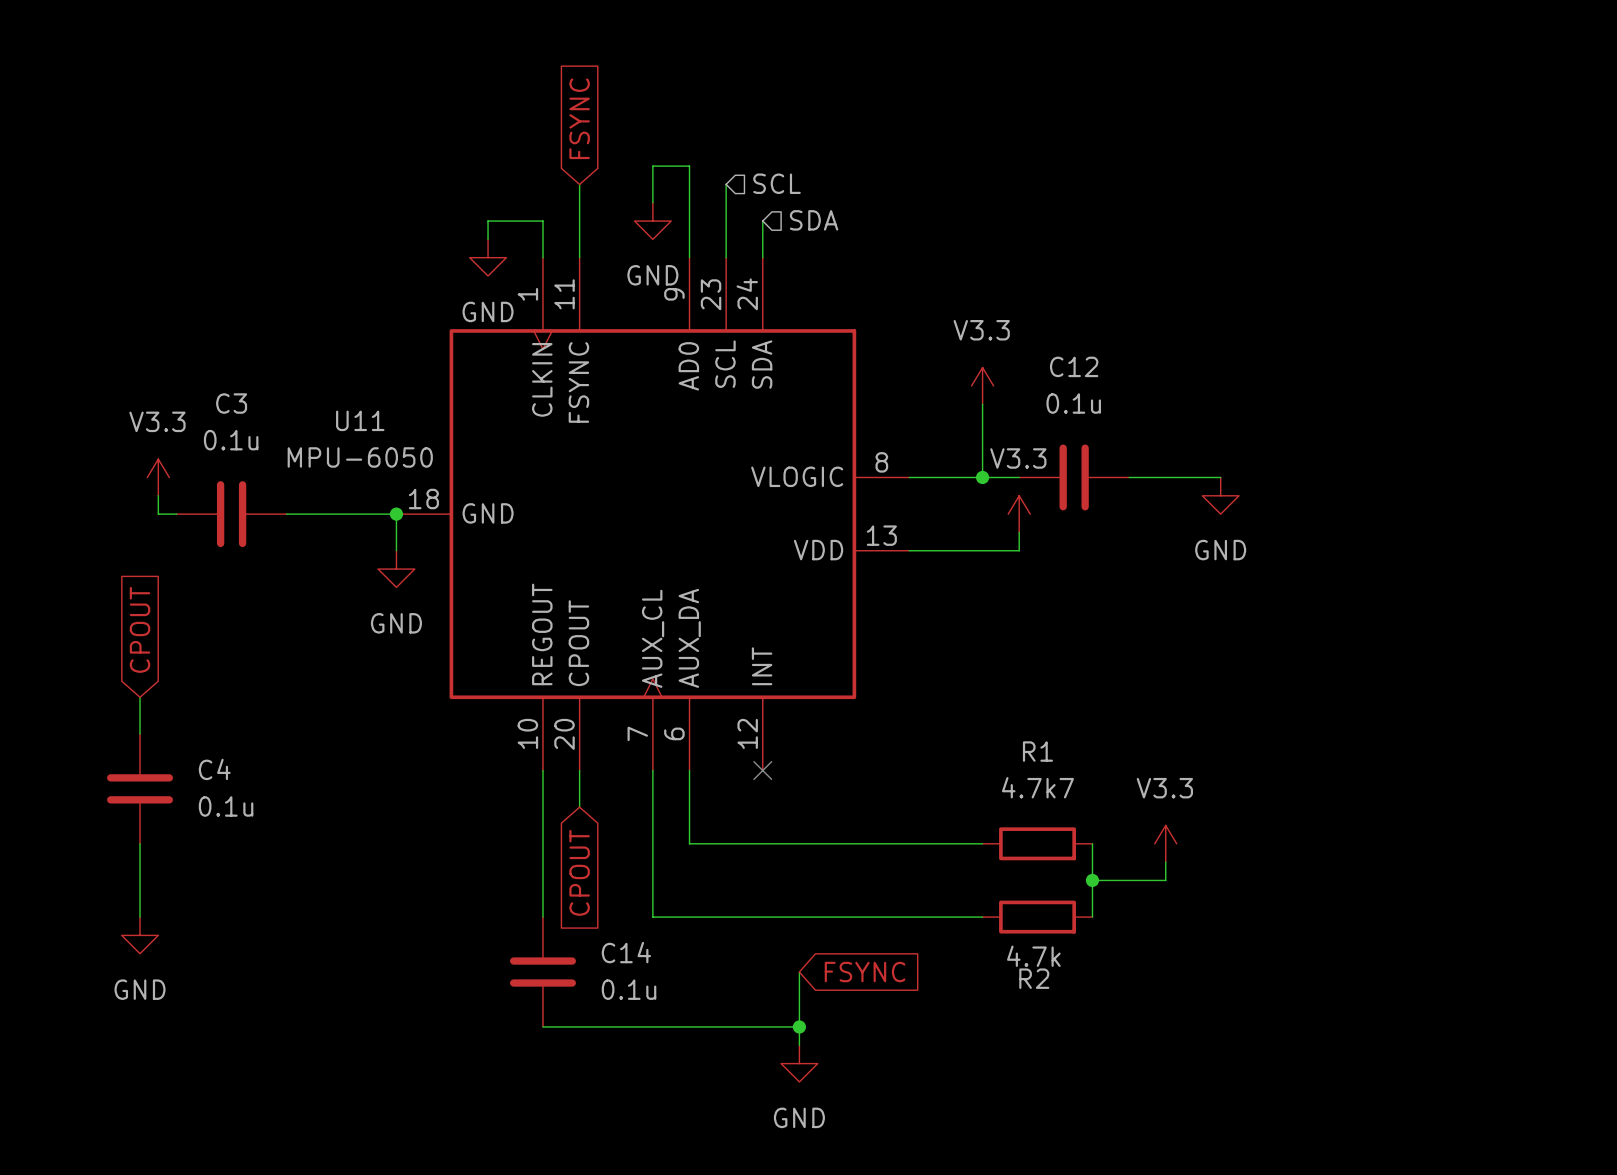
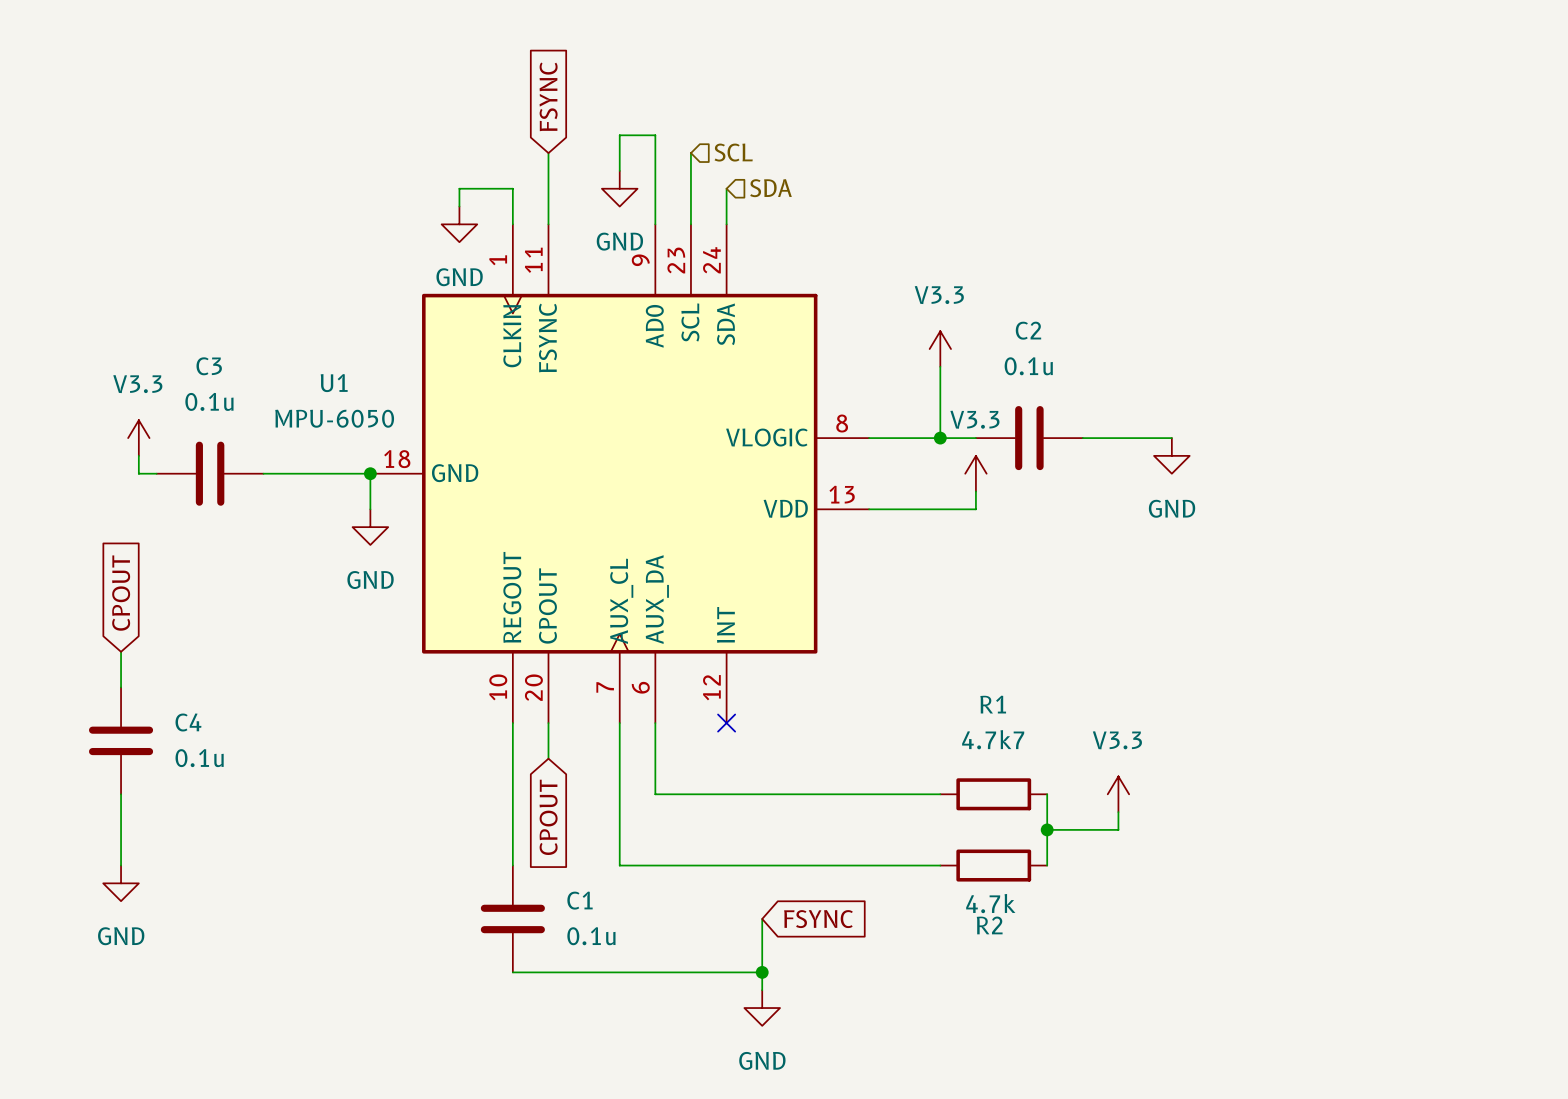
C12 name: C12 (1074, 366) -> C2 (1028, 330)
U11 name: U11 (360, 420) -> U1 (334, 383)
C14 name: C14 (626, 952) -> C1 (580, 900)

